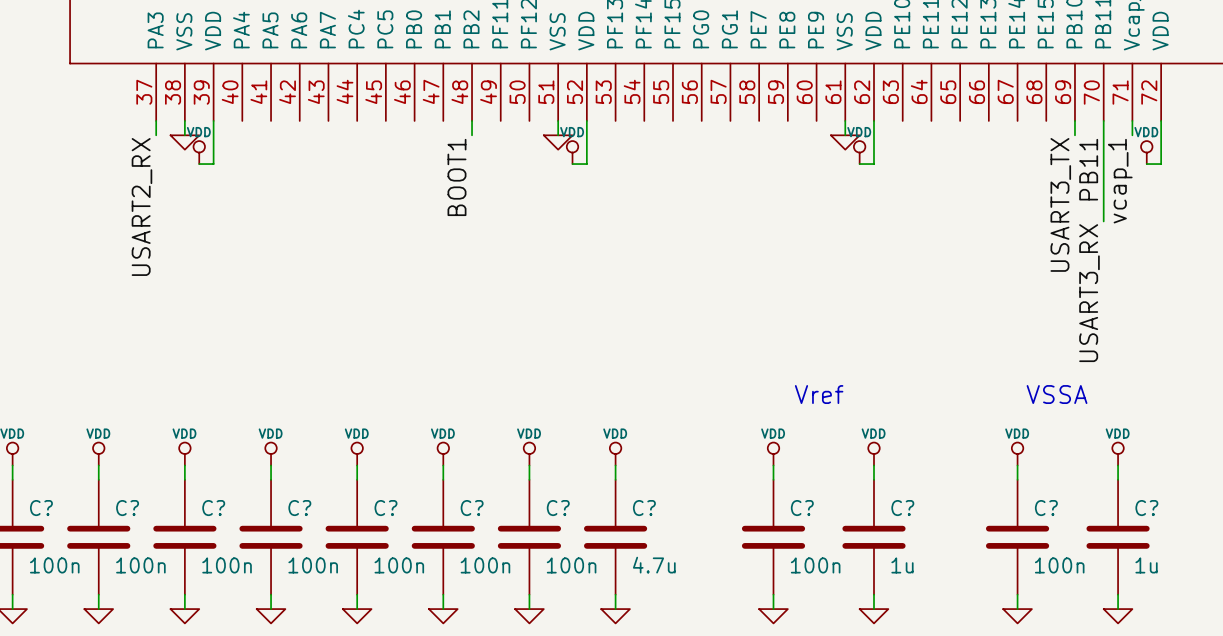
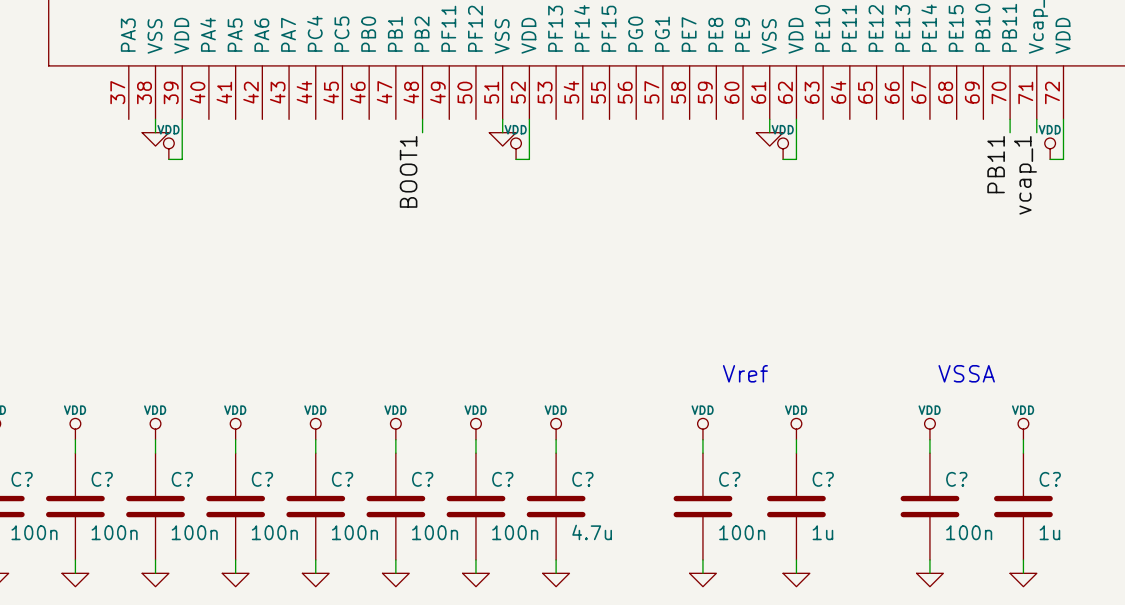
wire: (156, 120) (156, 135) -> none
wire: (1074, 120) (1074, 135) -> none
wire: (1103, 135) (1103, 221) -> none
label: USART3_TX (1060, 204) -> none
label: USART2_RX (141, 206) -> none
label: USART3_RX (1089, 293) -> none

